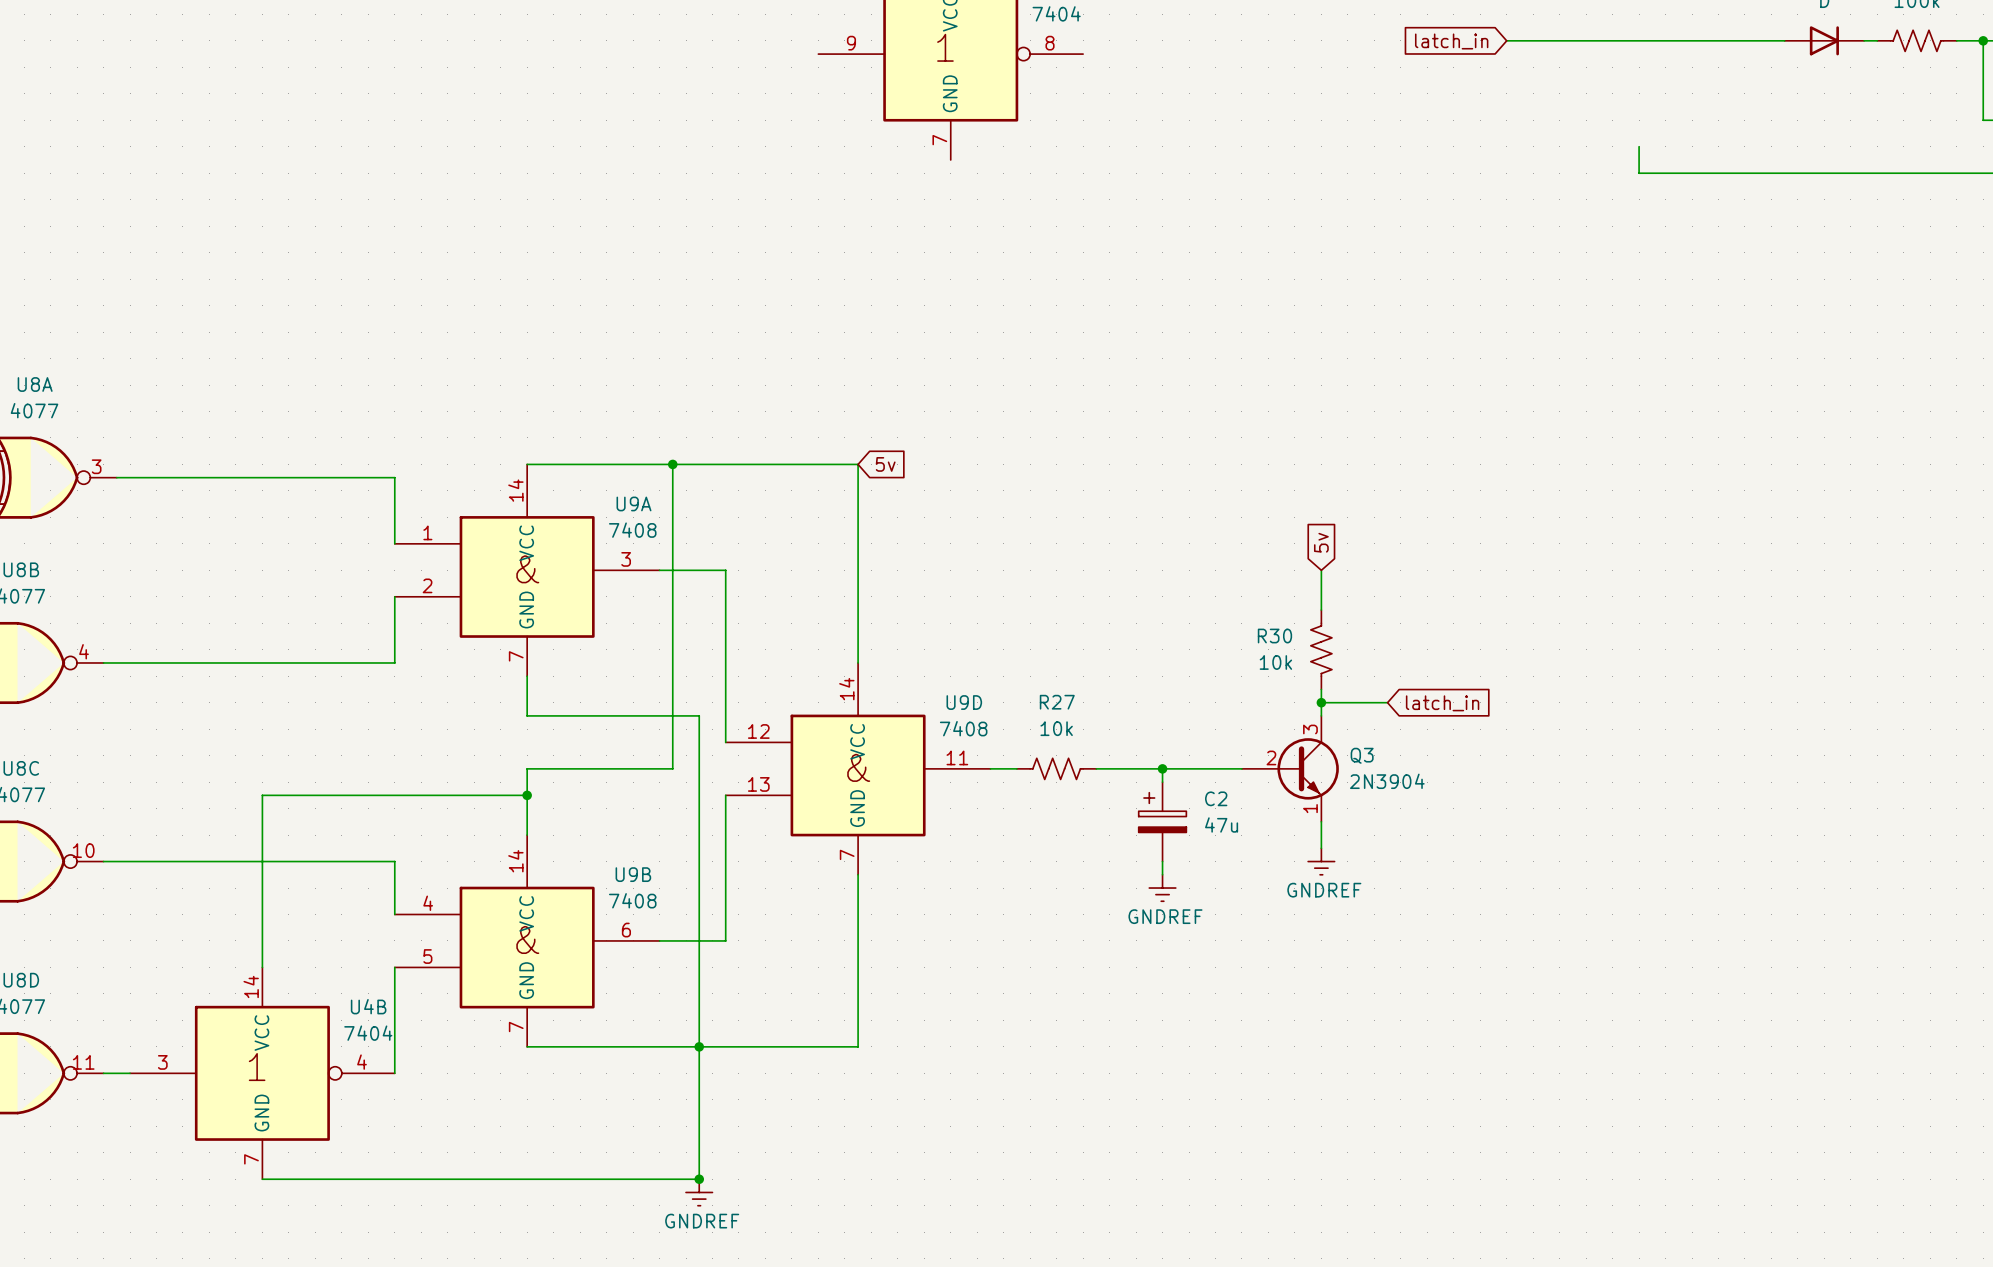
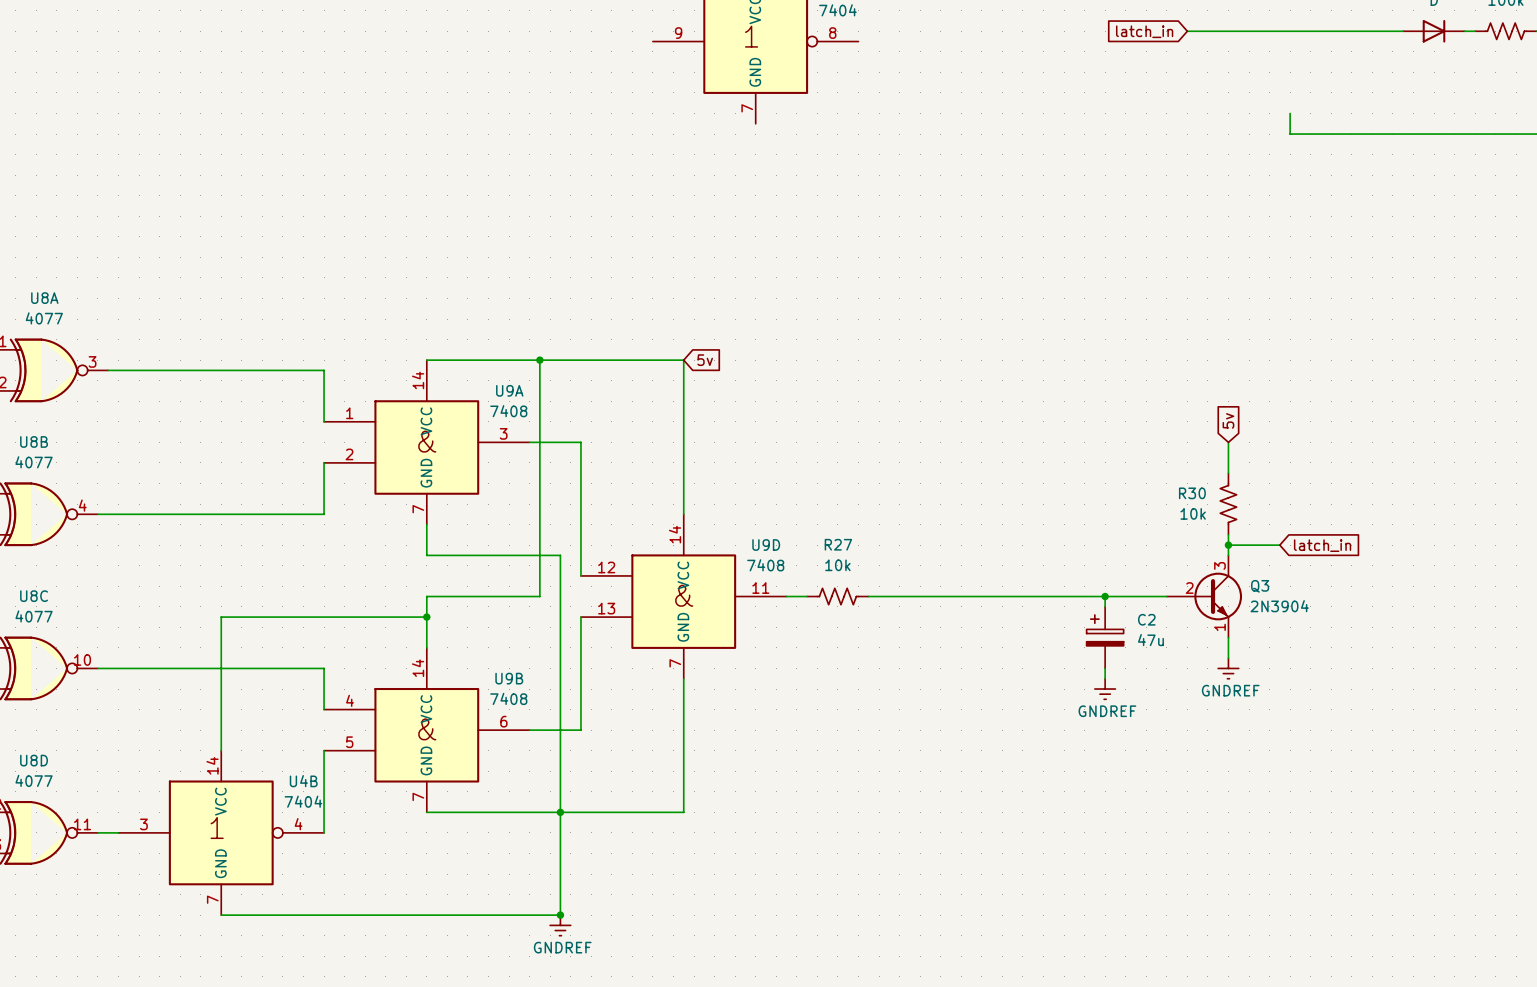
global label position: 5v (1321, 542) -> 5v (1228, 420)
wire: (1321, 570) (1321, 610) -> (1228, 442) (1228, 473)
R30 position: (1321, 649) -> (1228, 504)
wire: (1321, 689) (1321, 715) -> (1228, 534) (1228, 555)
wire: (1321, 702) (1387, 702) -> (1228, 545) (1279, 545)
junction: (1321, 702) -> none
junction: none -> (1228, 545)
global label position: latch_in (1442, 703) -> latch_in (1322, 545)
wire: (1162, 768) (1162, 782) -> (1105, 596) (1105, 606)
junction: (1162, 768) -> none
wire: none -> (981, 596) (1166, 596)
Q3 position: (1290, 768) -> (1204, 596)
junction: none -> (1105, 596)
C2 position: (1162, 821) -> (1105, 637)
wire: (1321, 821) (1321, 848) -> (1228, 637) (1228, 658)
wire: (1162, 861) (1162, 874) -> (1105, 668) (1105, 678)
power symbol position: GNDREF (1321, 861) -> GNDREF (1105, 689)
power symbol: none -> GNDREF (1228, 668)
power symbol: GNDREF (1162, 888) -> none

